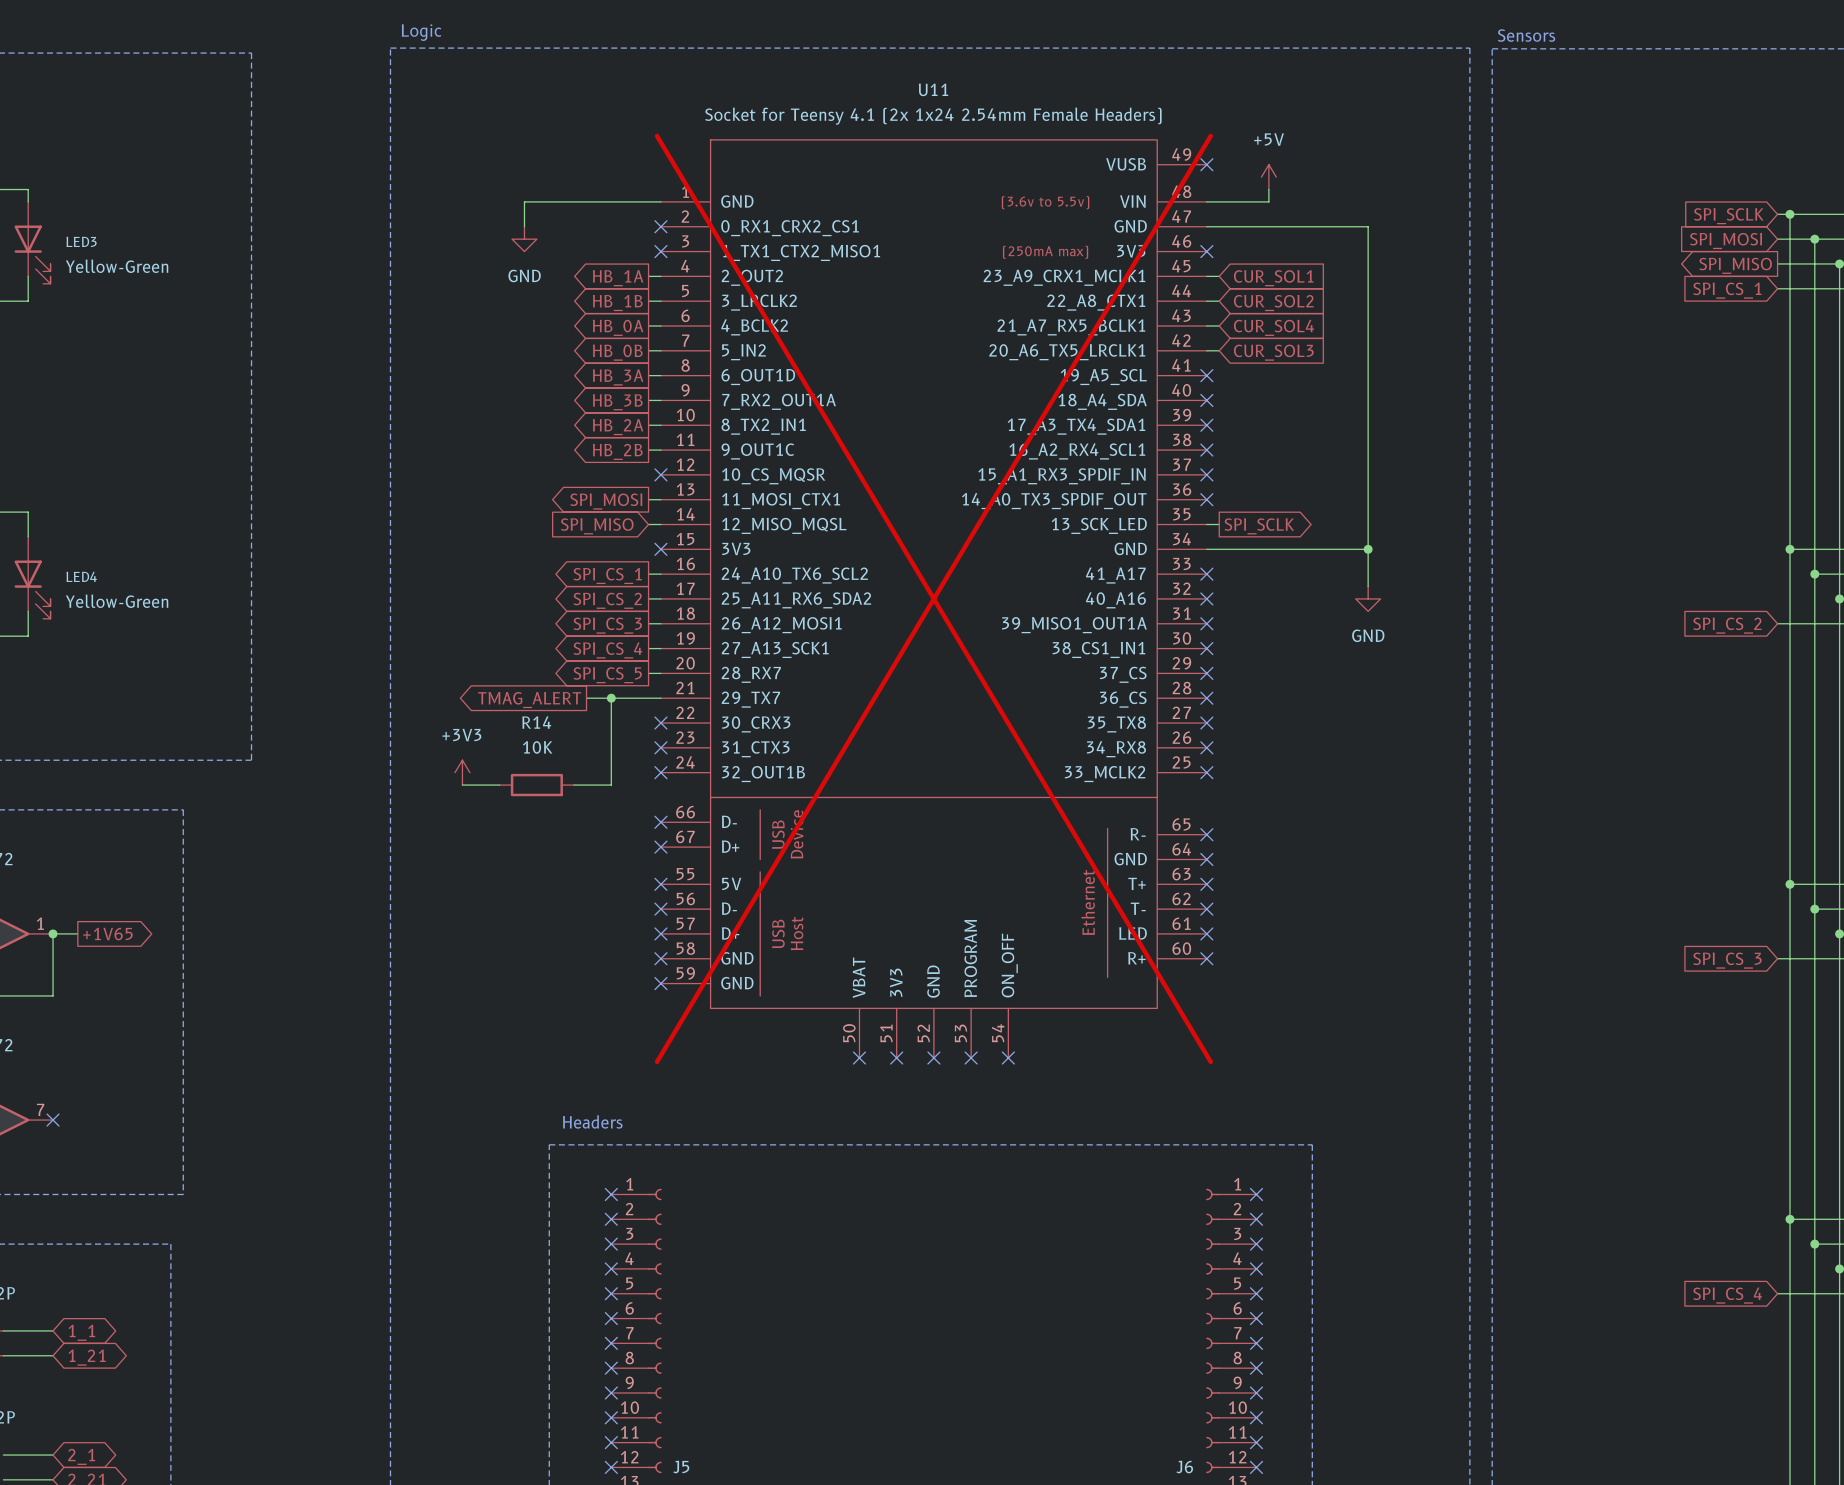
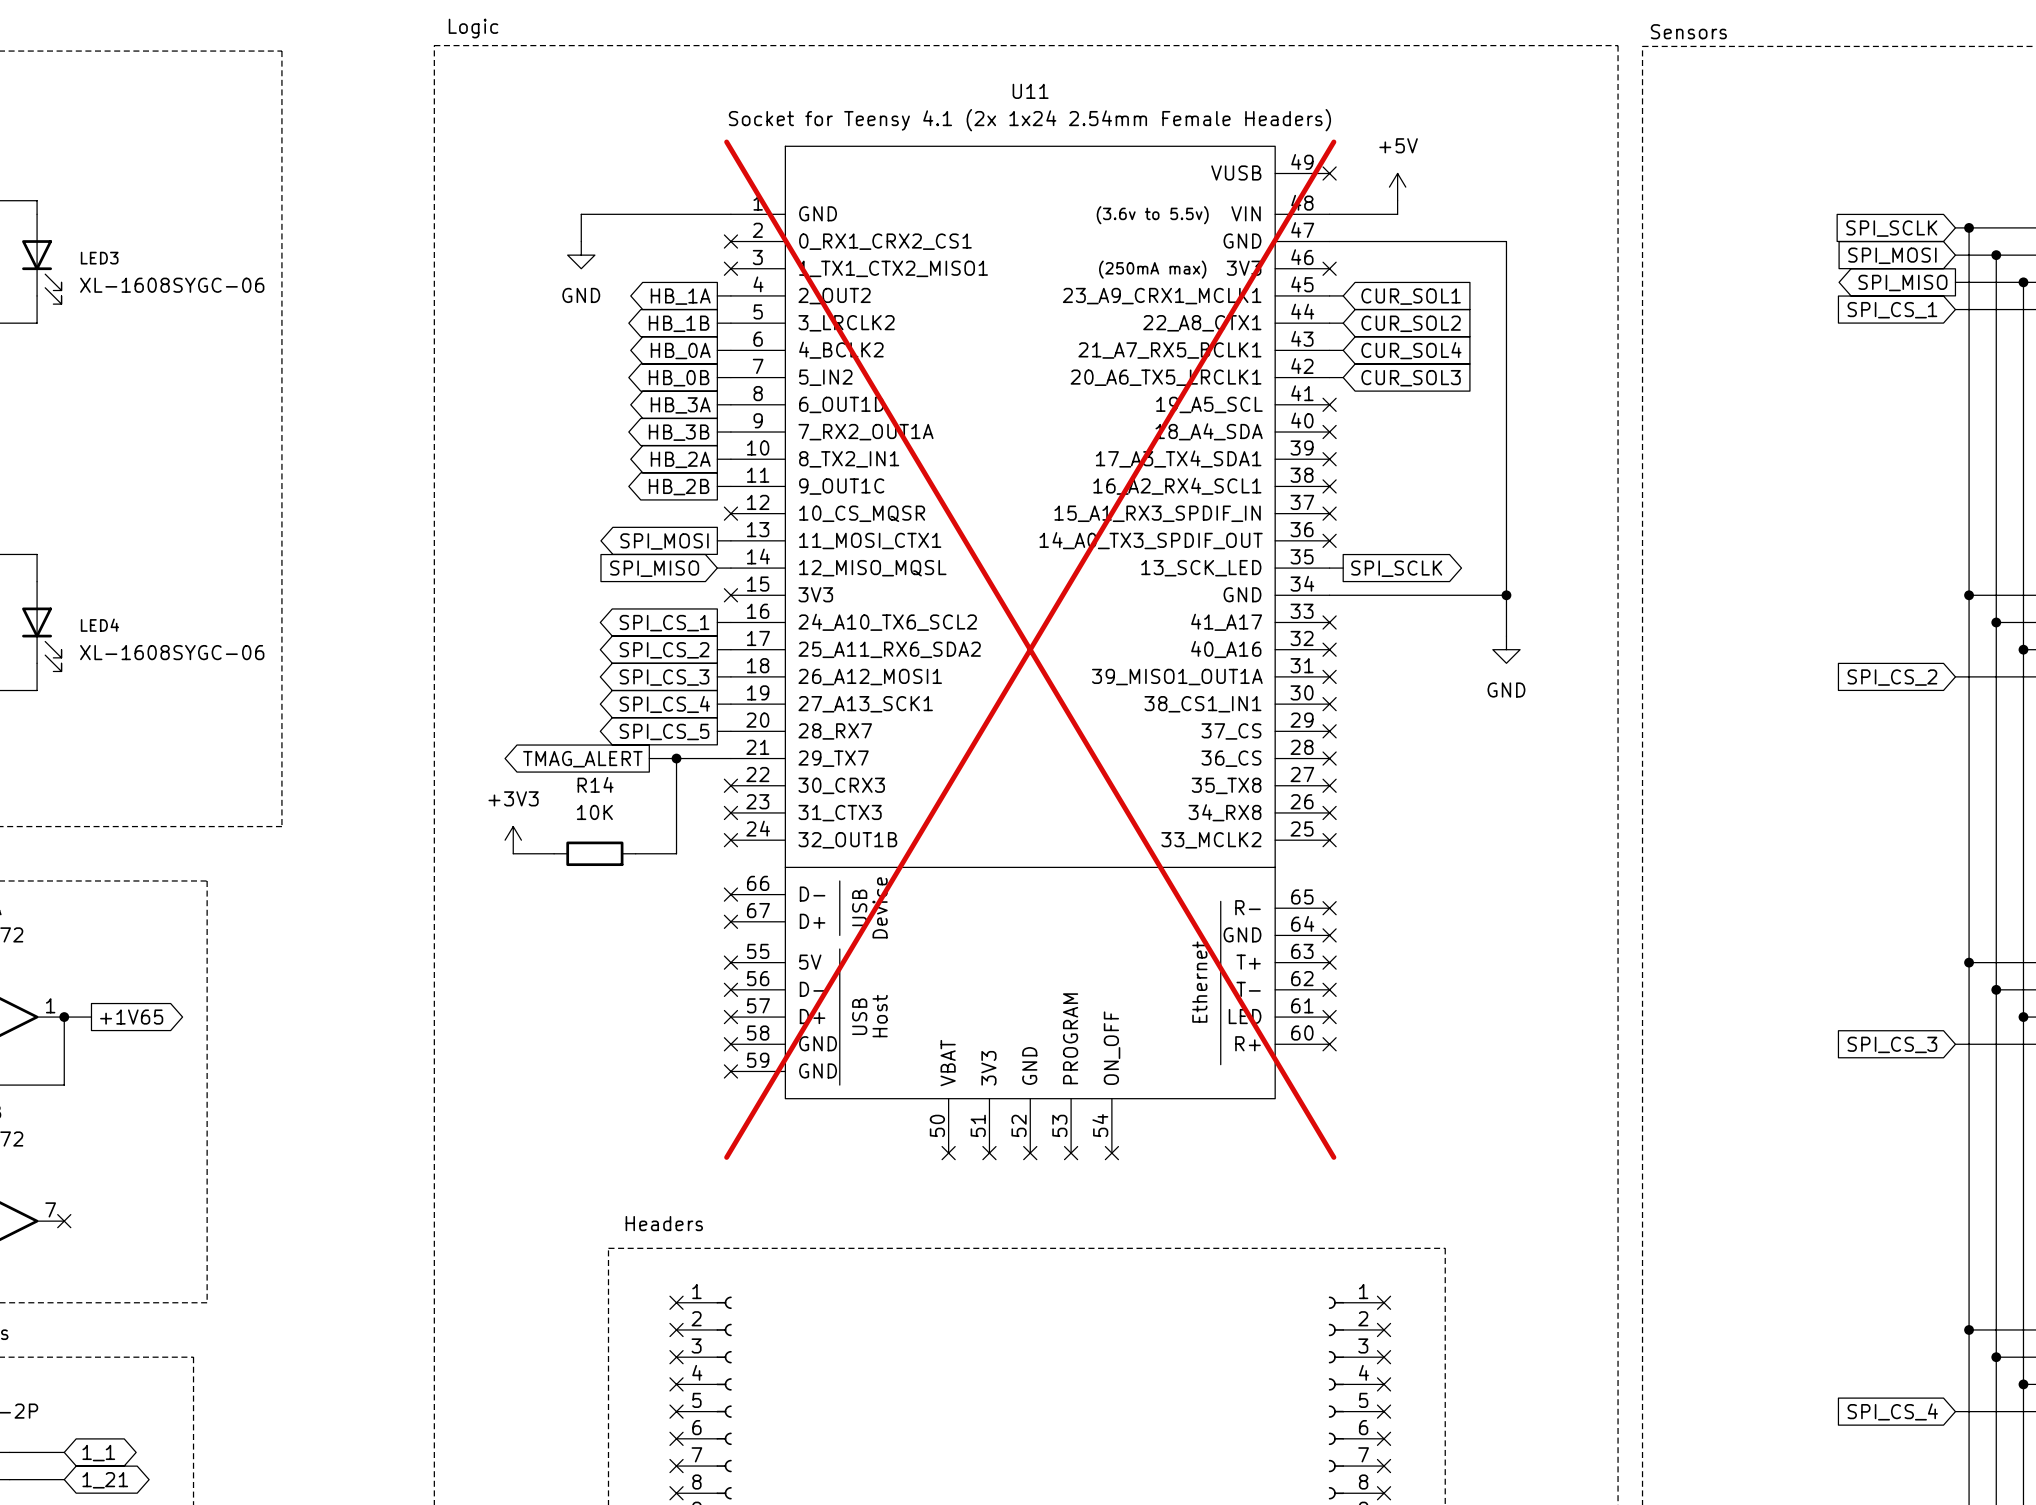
LED3 value: Yellow-Green (117, 266) -> XL-1608SYGC-06 (172, 285)
LED4 value: Yellow-Green (117, 601) -> XL-1608SYGC-06 (172, 652)

